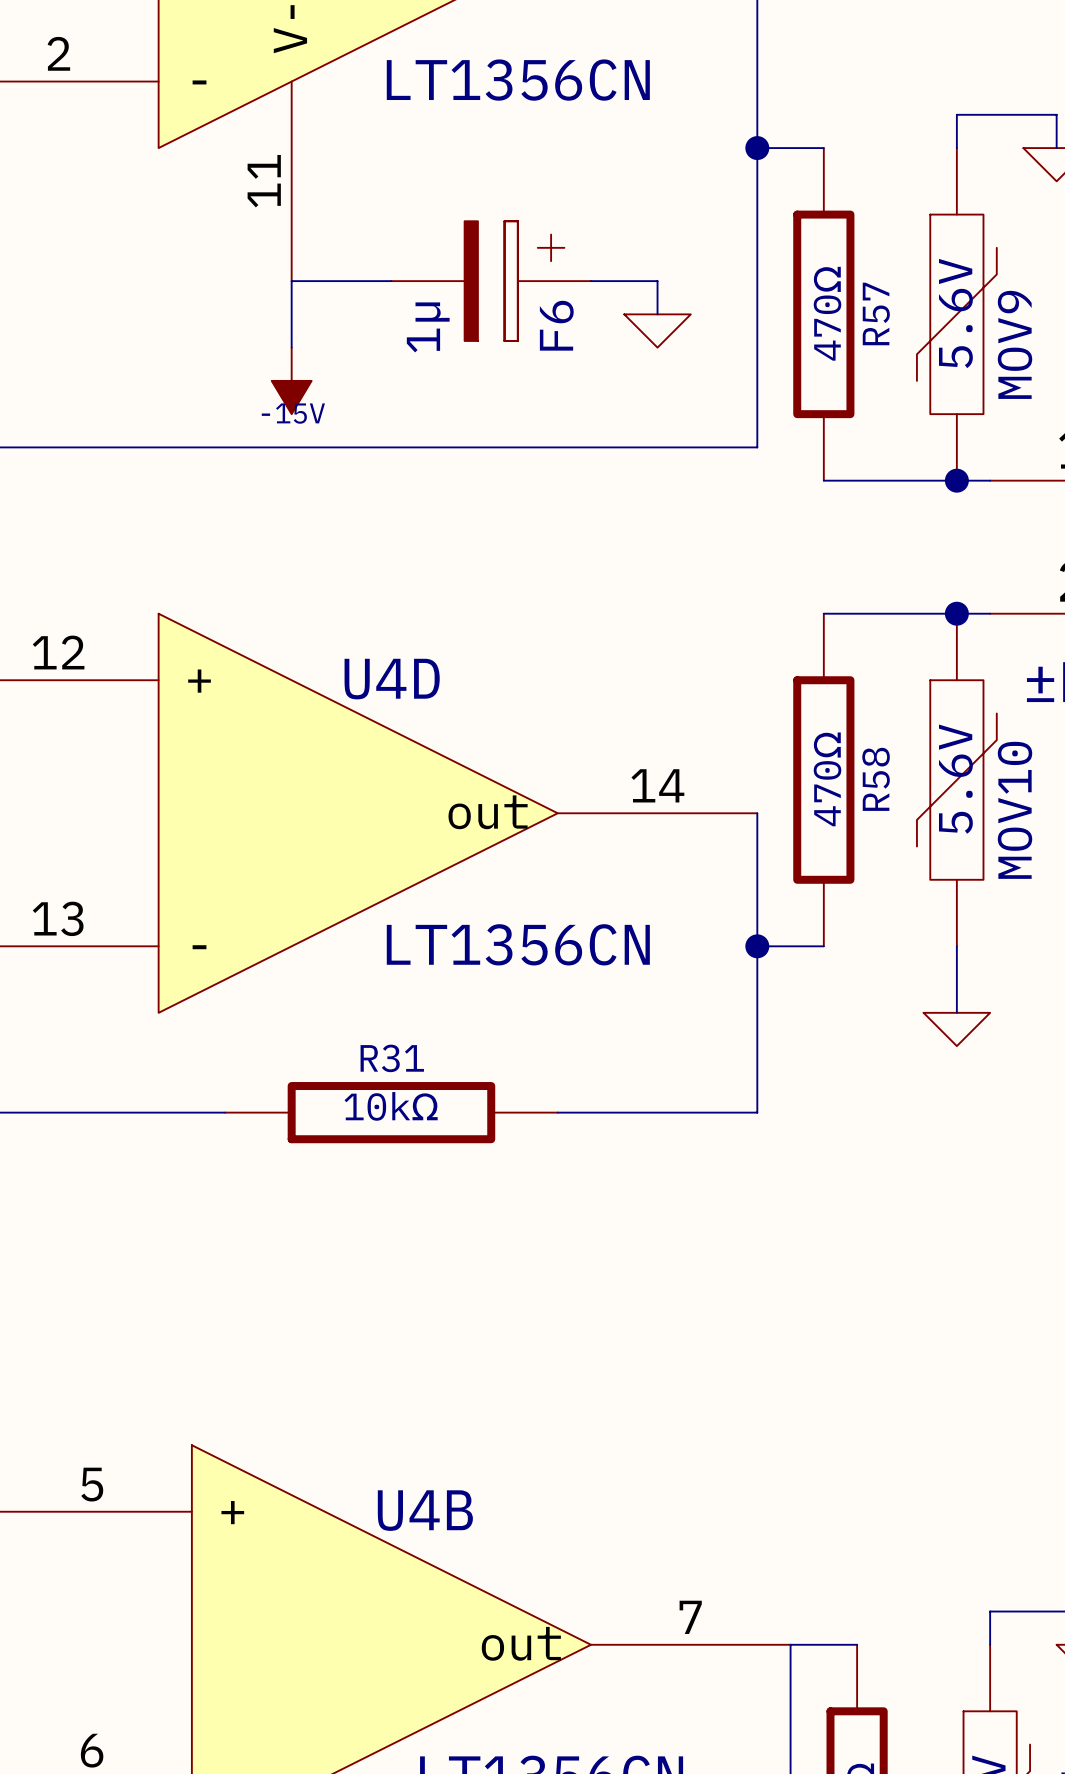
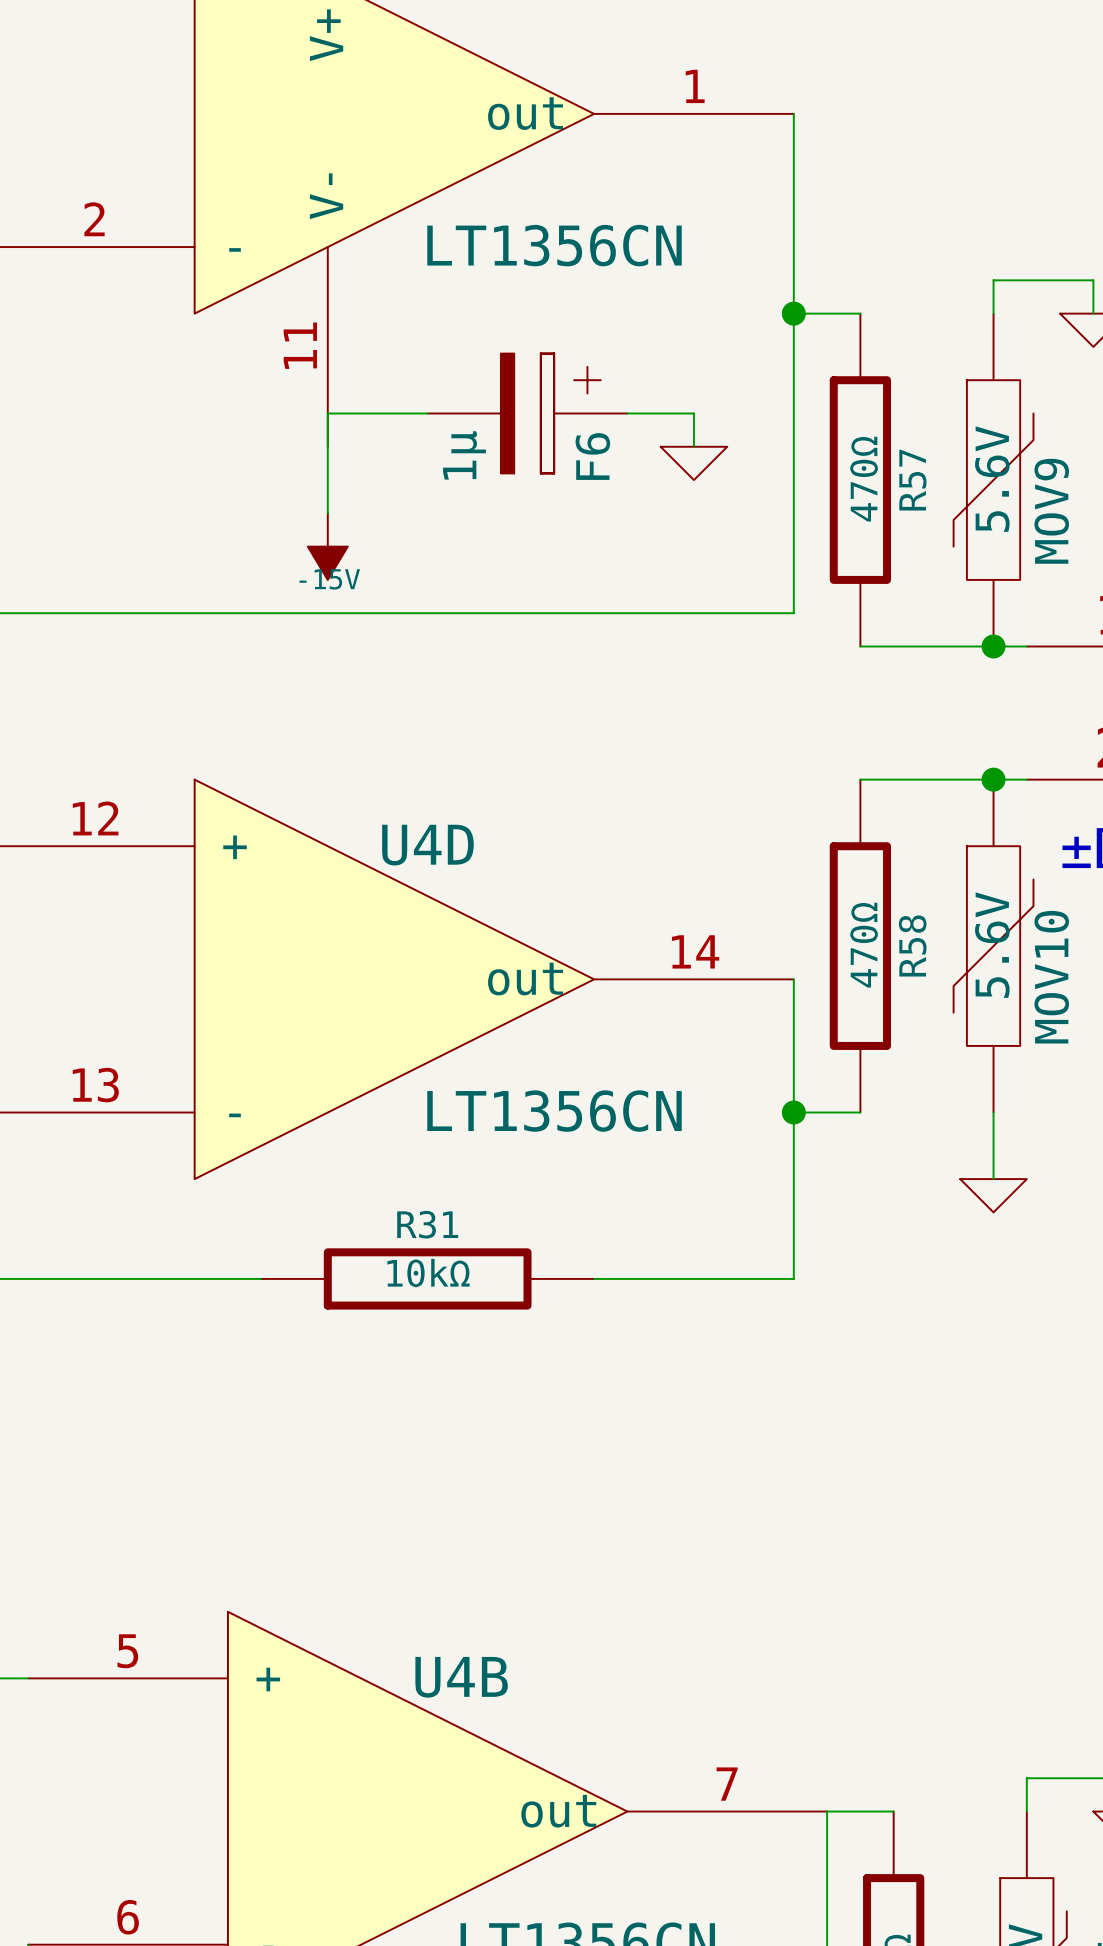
wire: (291, 281) (391, 281) -> (327, 446) (327, 413) (427, 413)
F6 position: (491, 281) -> (527, 413)
wire: (591, 281) (657, 281) (657, 314) -> (627, 413) (693, 413) (693, 446)
power symbol position: (657, 331) -> (693, 463)

